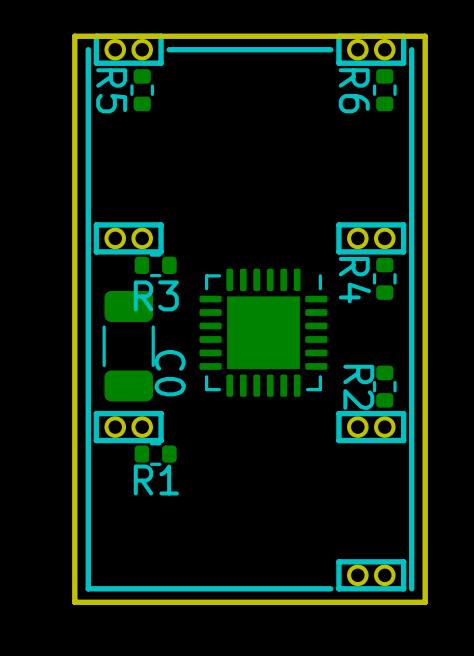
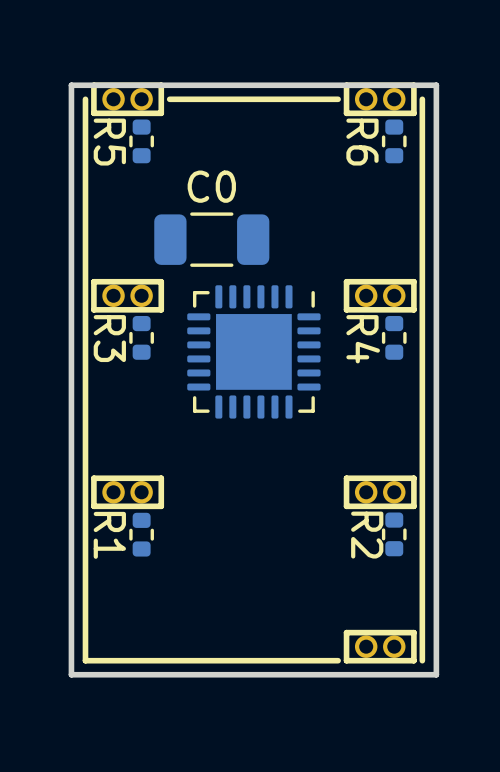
R3 rotation: 0° (155, 265) -> 90° clockwise (141, 337)
part position: (263, 332) -> (253, 351)
C0 rotation: 0° (128, 346) -> 90° clockwise (211, 239)
C0 position: (128, 346) -> (211, 239)
C0 name position: C0 (170, 373) -> C0 (211, 186)
R2 position: (384, 386) -> (394, 534)
R1 rotation: 0° (155, 454) -> 90° clockwise (141, 534)

